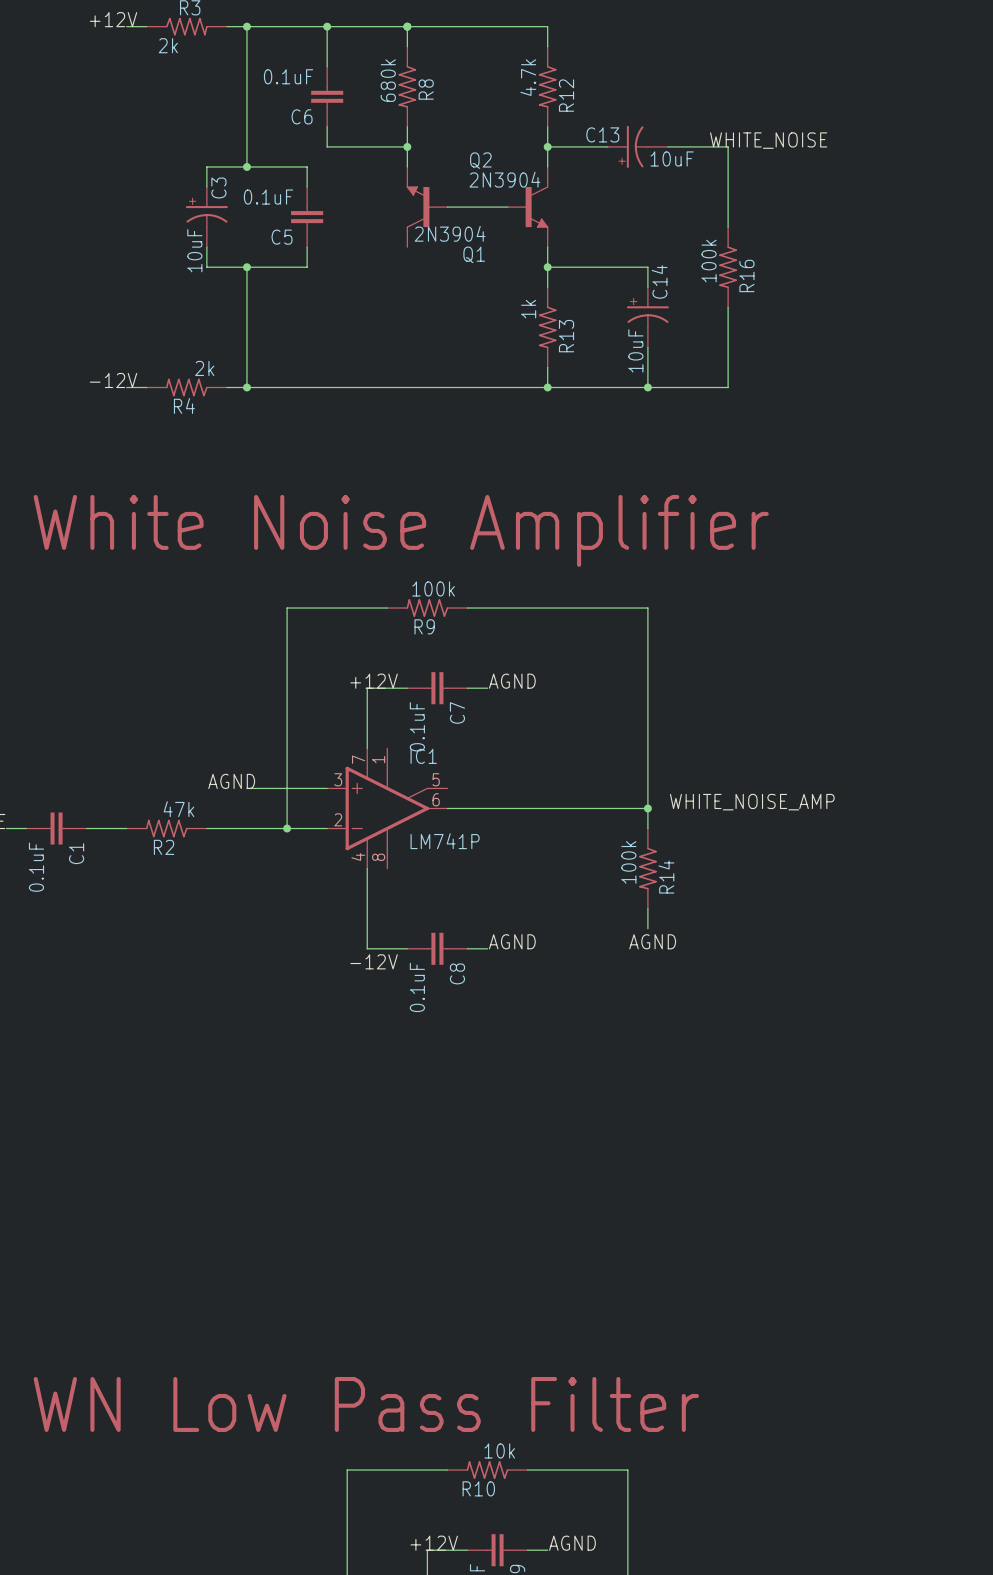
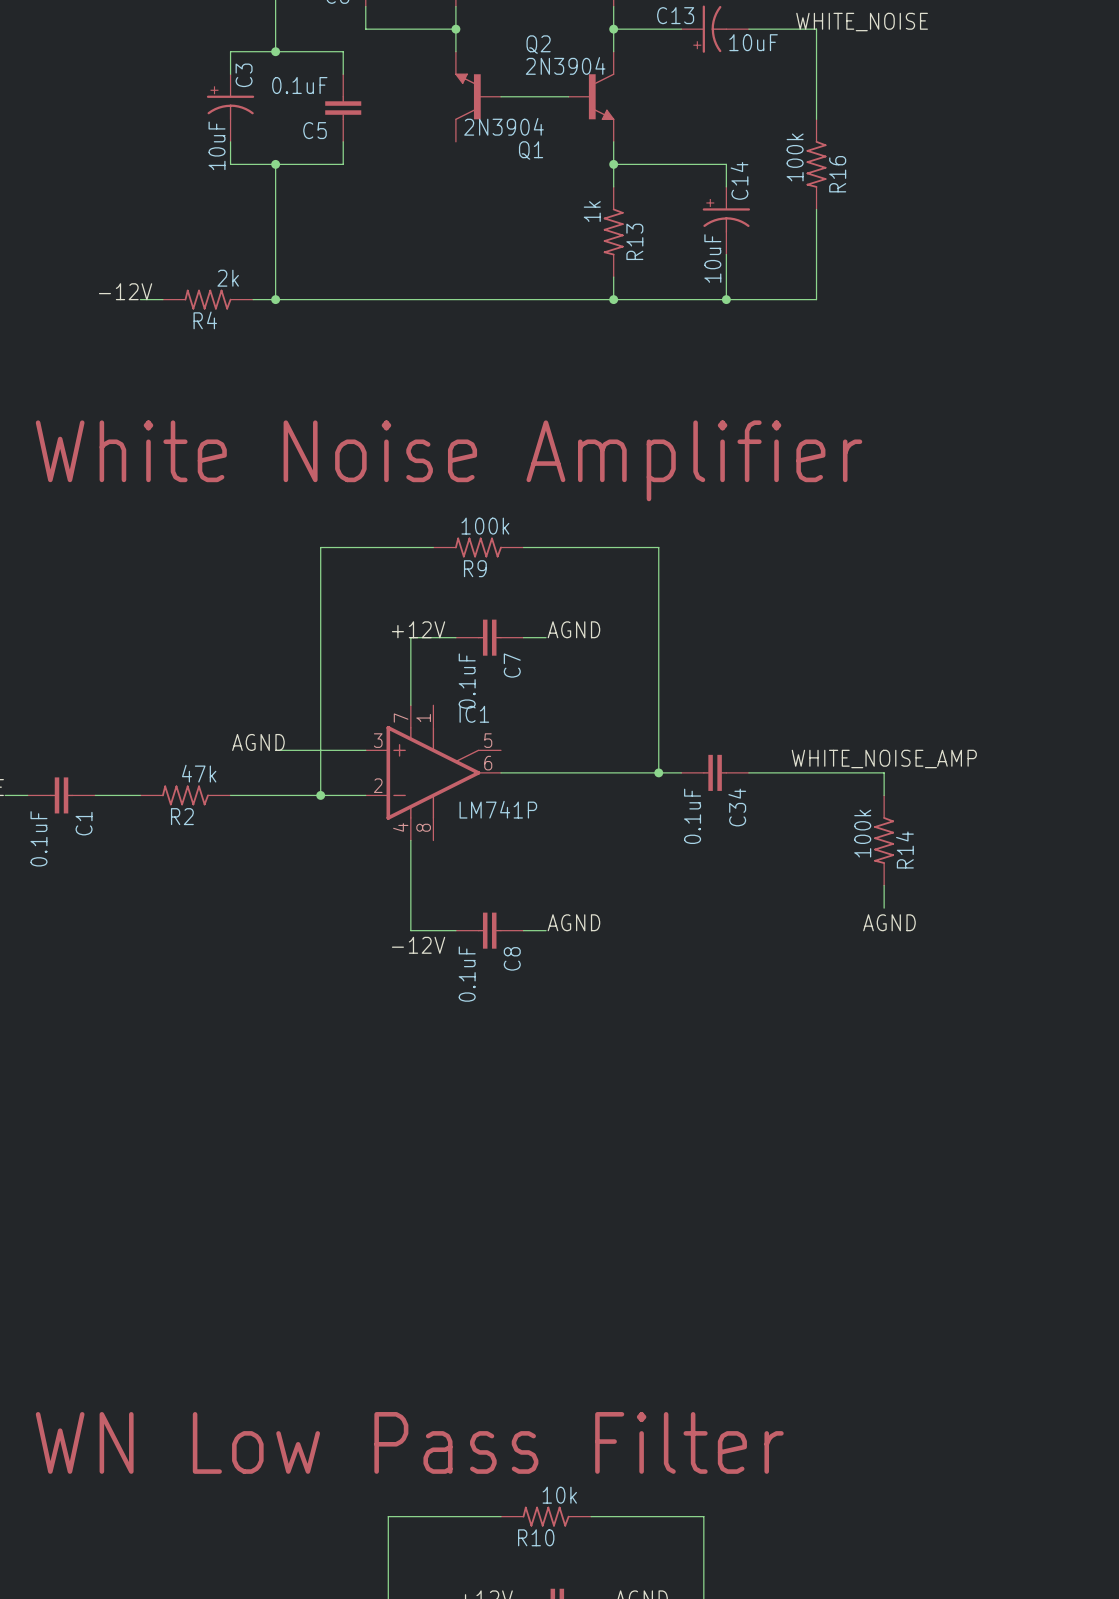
wire: (587, 608) (647, 608) (647, 828) -> (658, 547) (658, 772)
label position: WHITE_NOISE_AMP (752, 802) -> WHITE_NOISE_AMP (884, 758)
junction: none -> (658, 772)
C34: none -> 0.1uF (715, 772)
junction: (647, 808) -> none
wire: none -> (748, 772) (884, 772) (884, 795)
R14 position: (647, 868) -> (884, 840)
wire: (647, 908) (647, 928) -> (884, 885) (884, 908)
label position: AGND (652, 941) -> AGND (889, 922)

